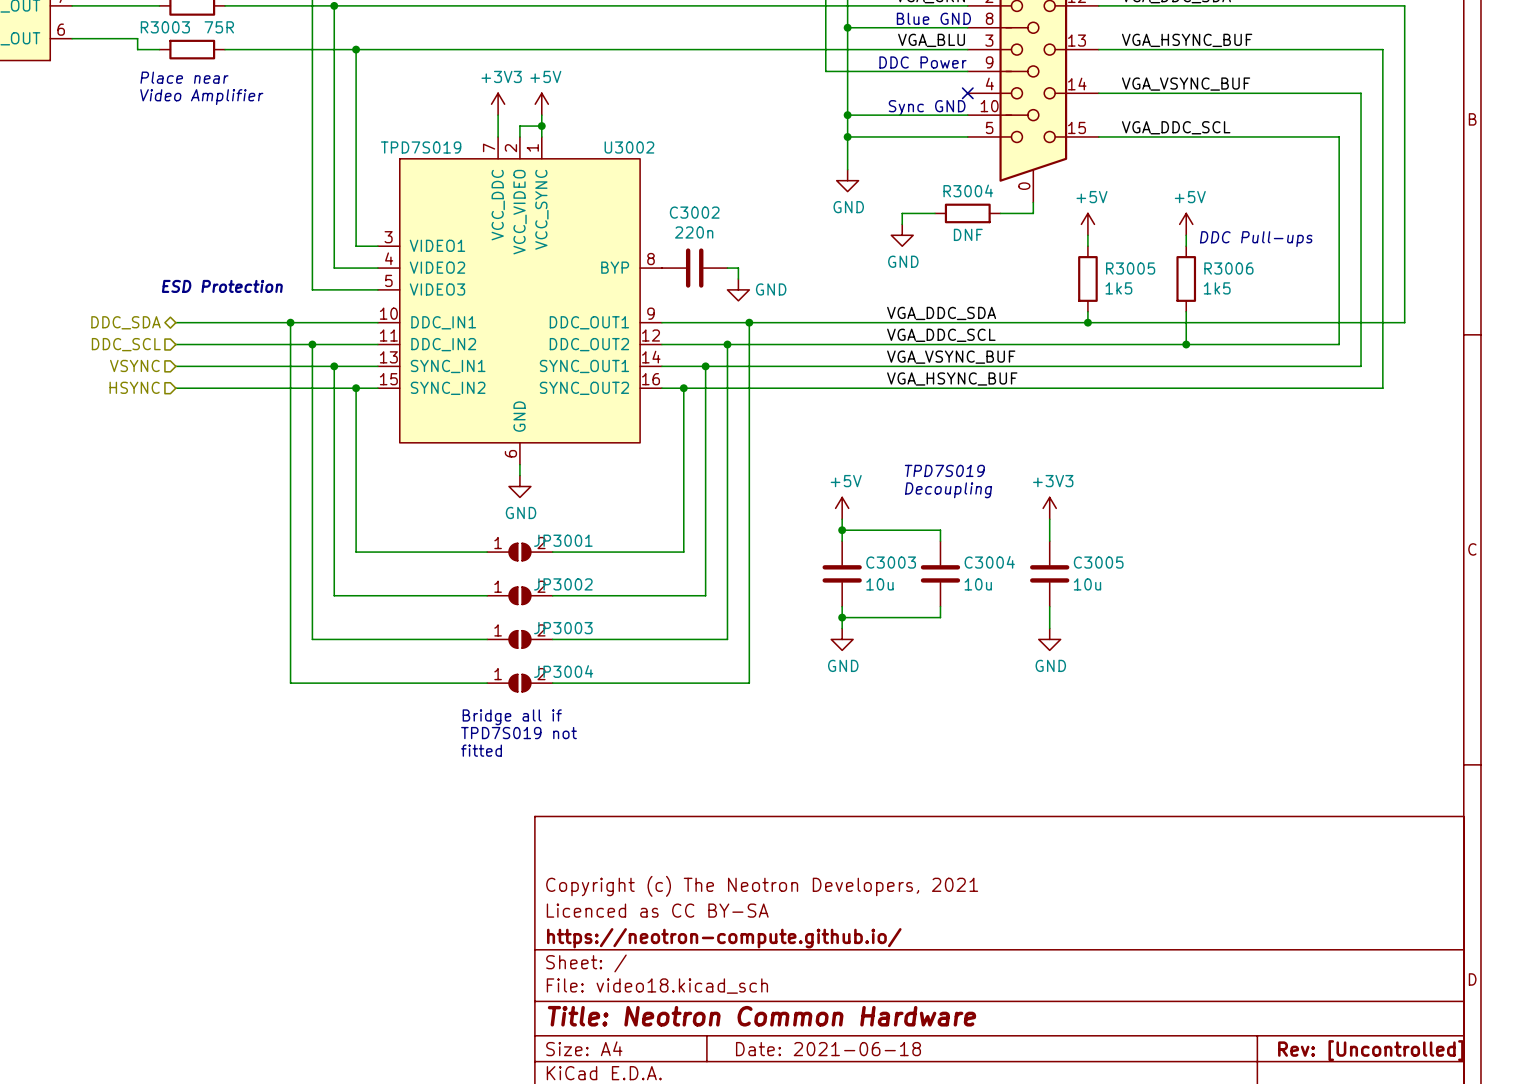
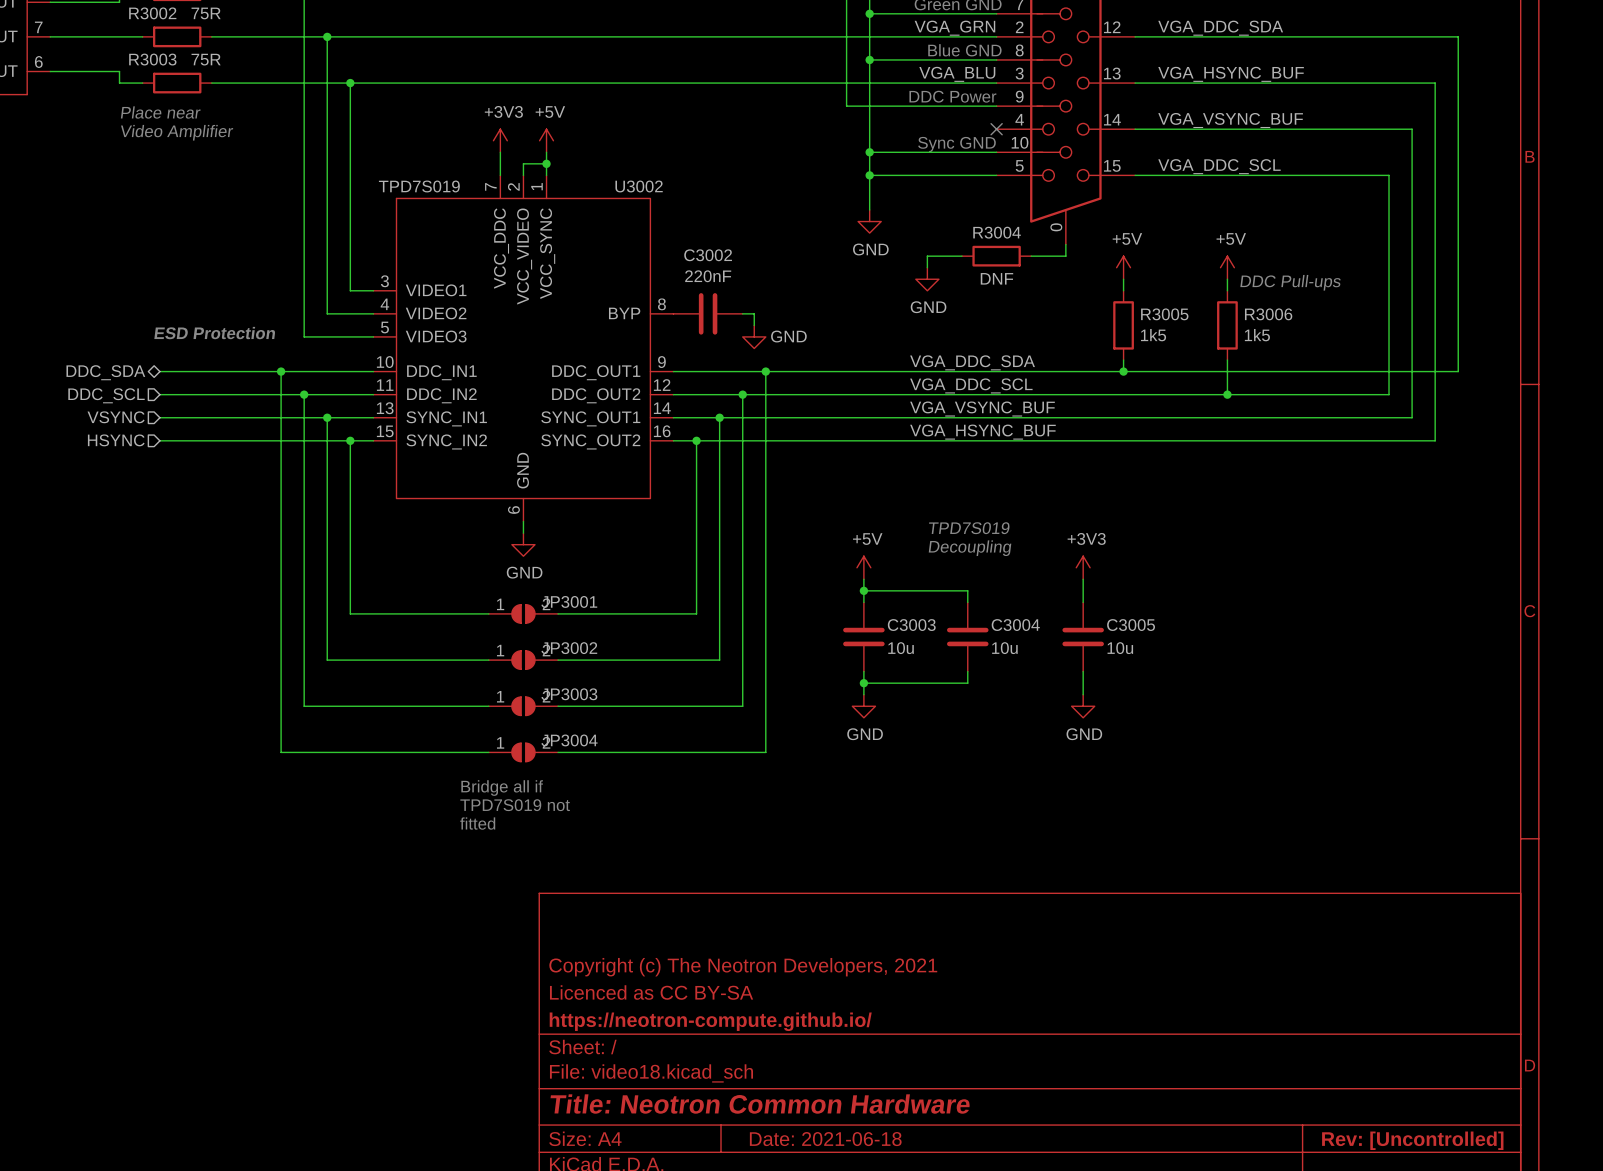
C3002 value: 220n (694, 232) -> 220nF (708, 276)

